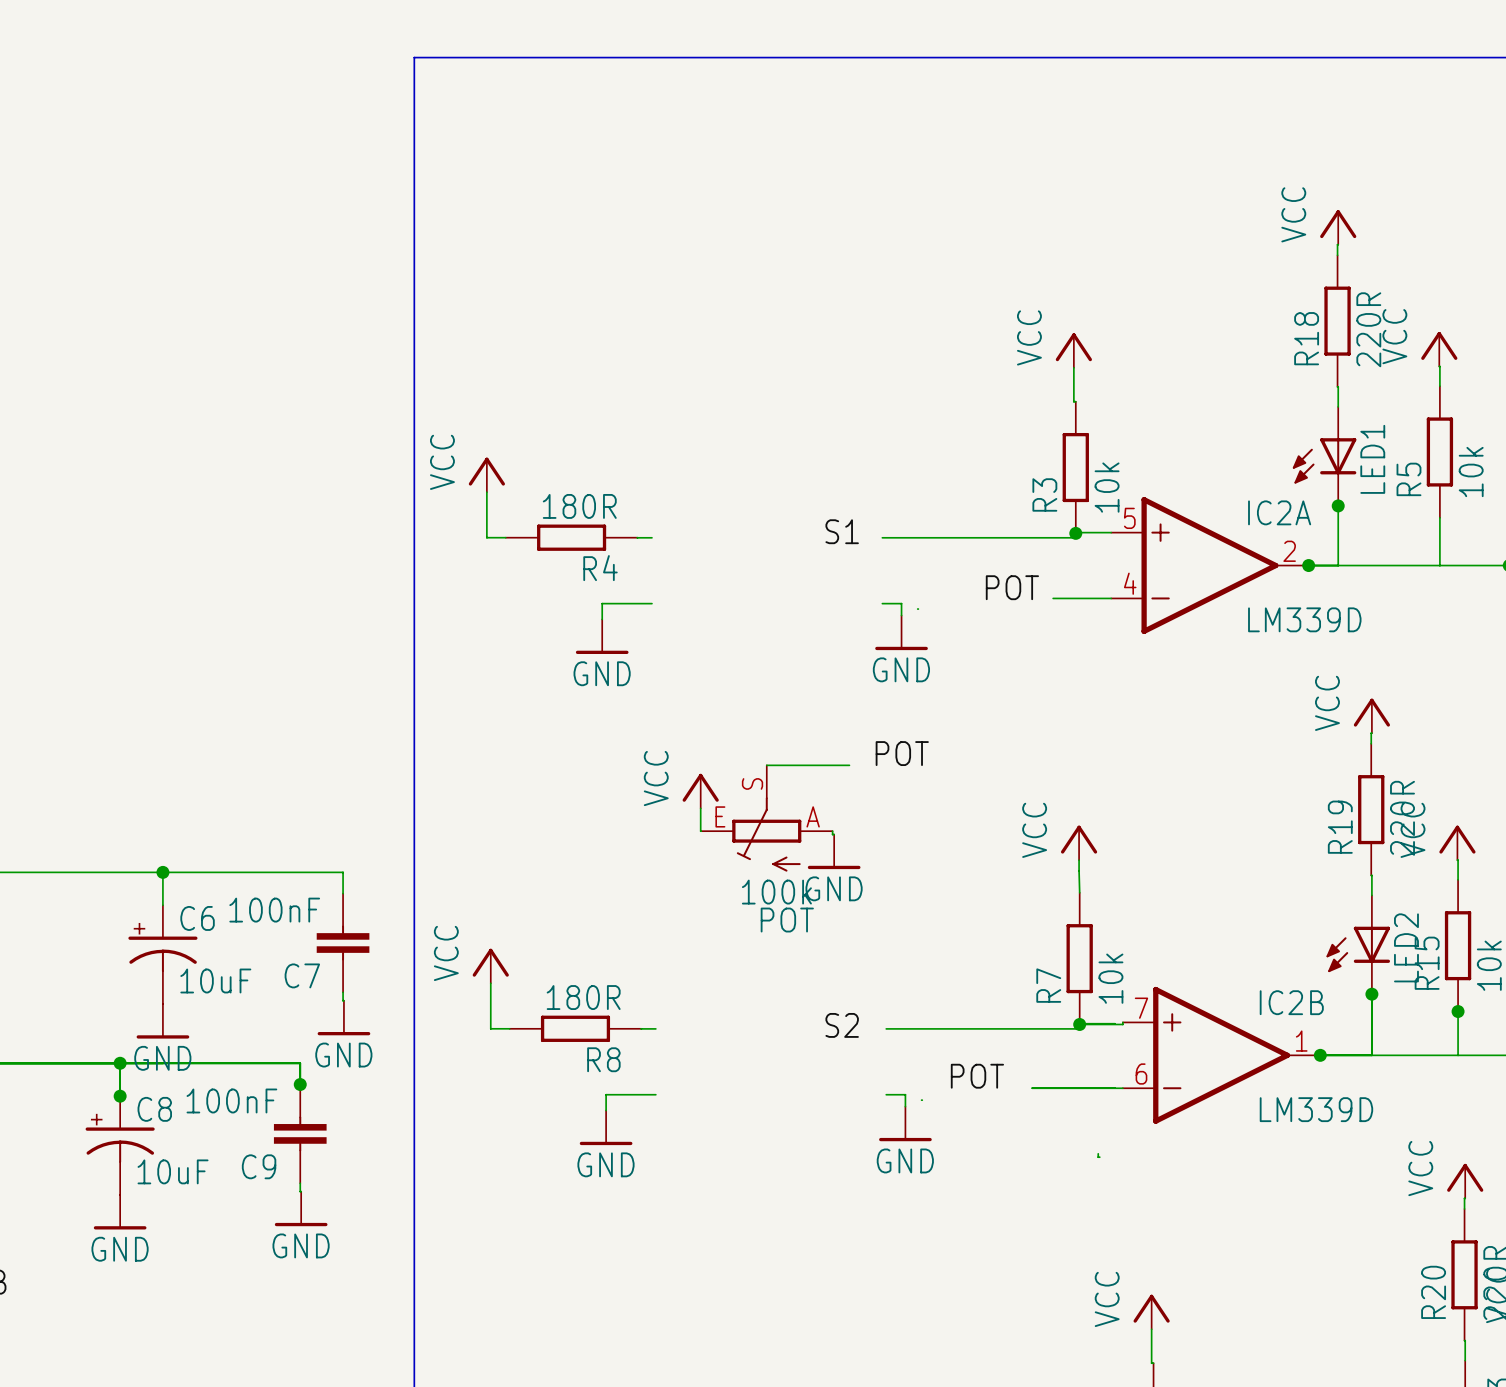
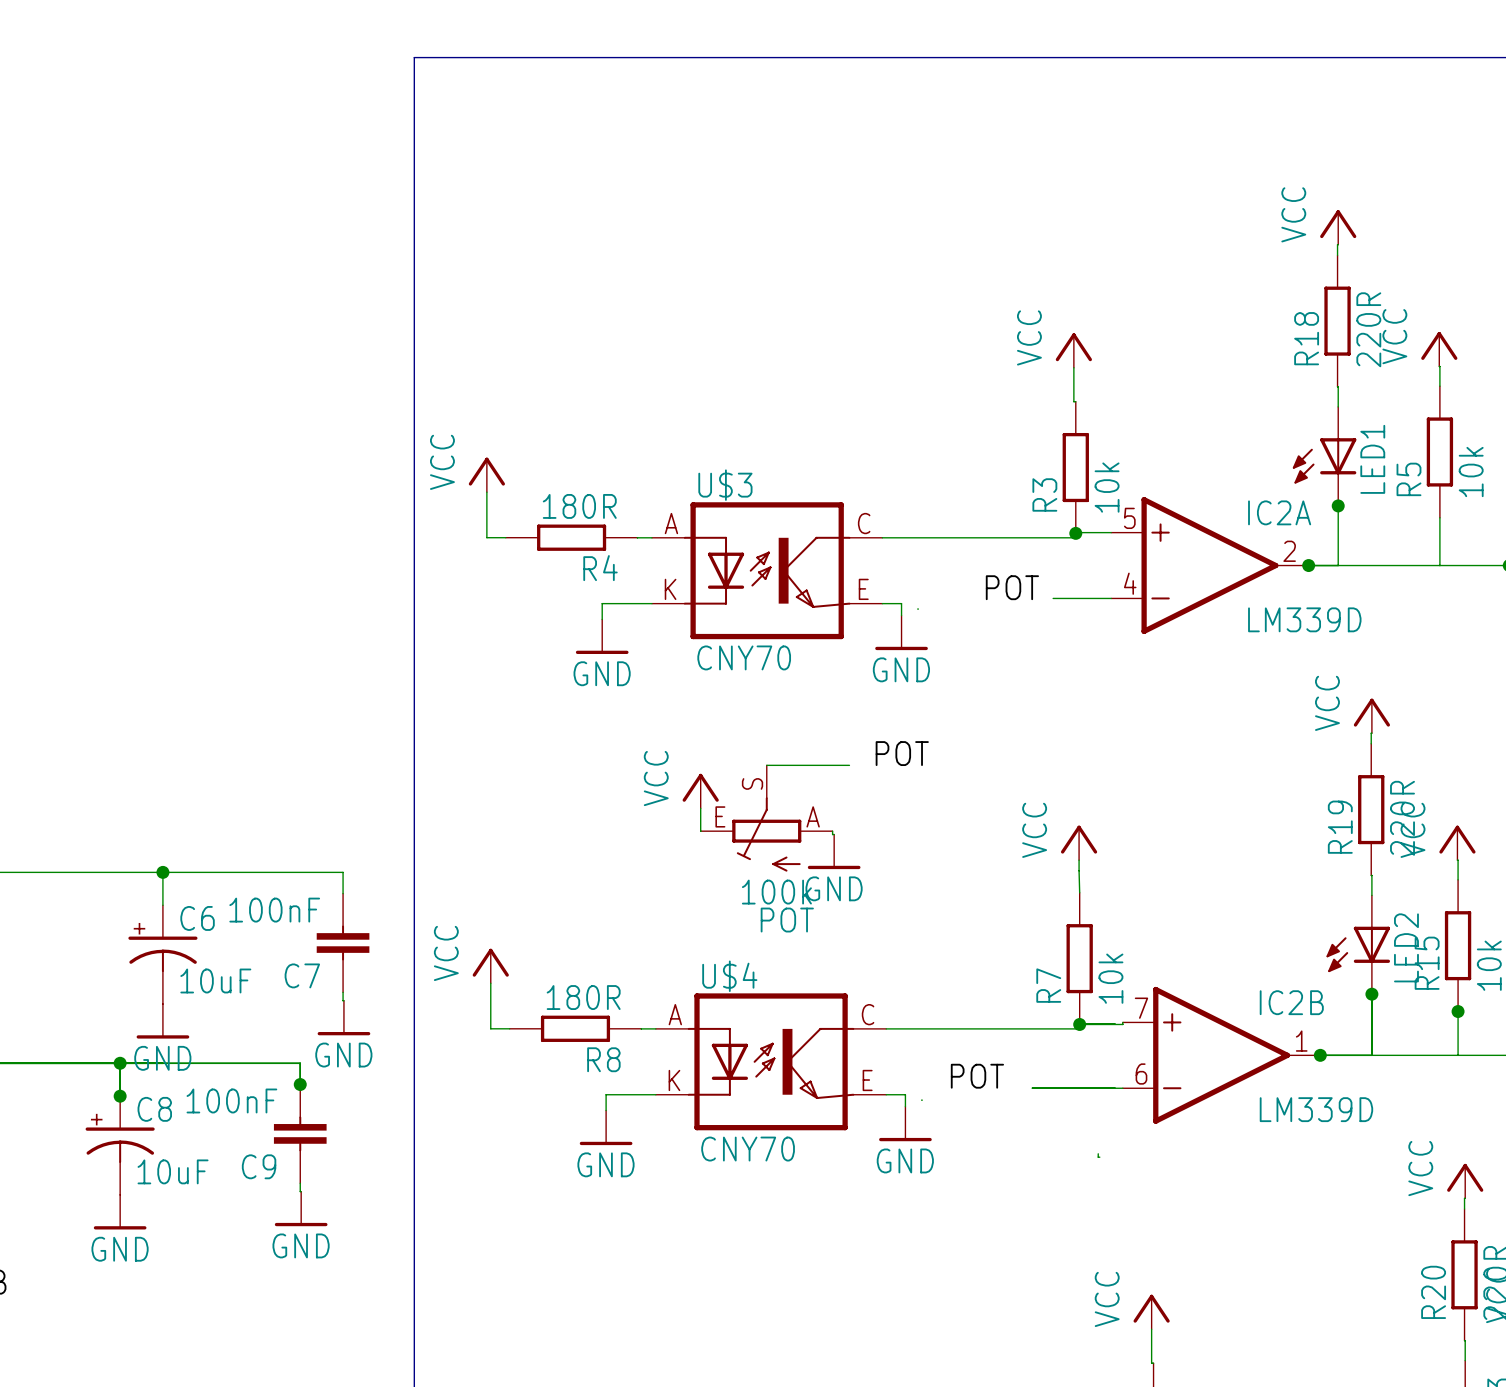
label: S1 (842, 531) -> none
U$3: none -> CNY70 (767, 570)
label: S2 (842, 1025) -> none
U$4: none -> CNY70 (771, 1061)

